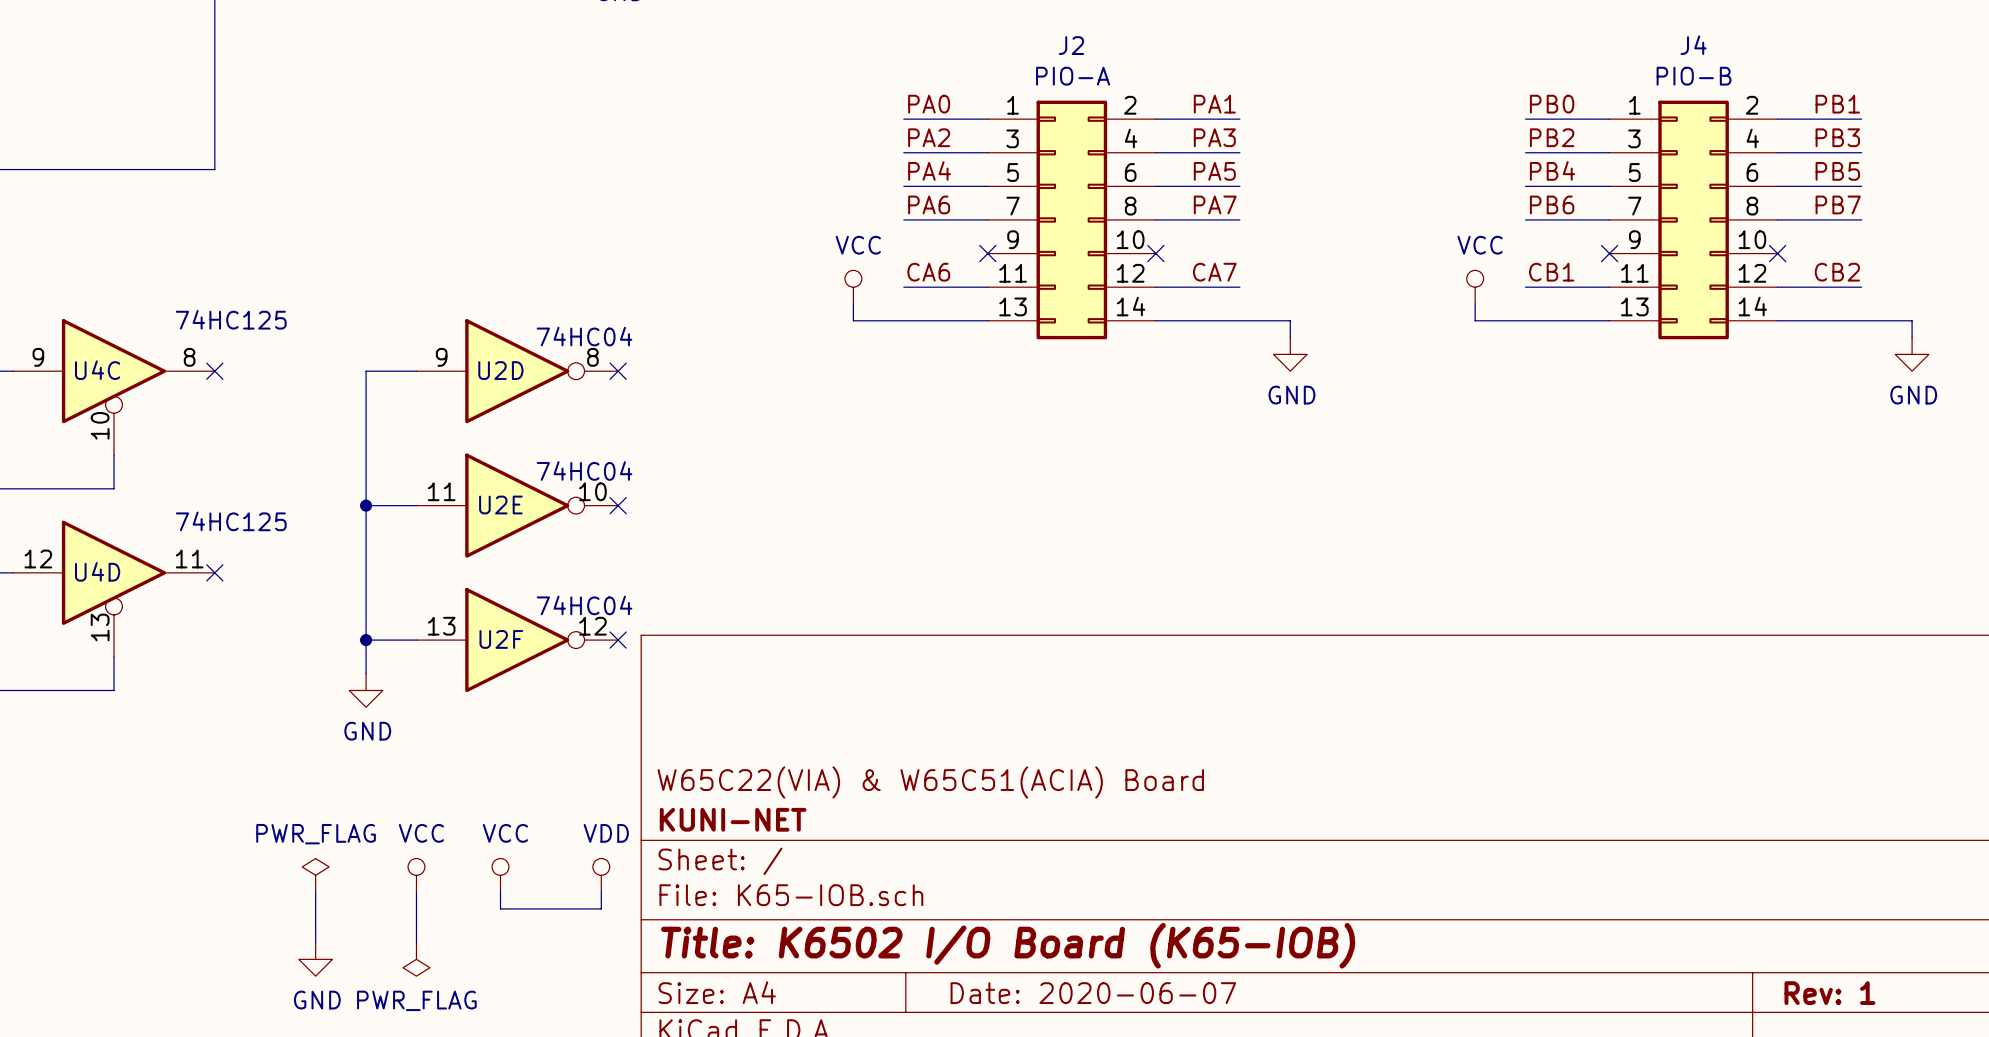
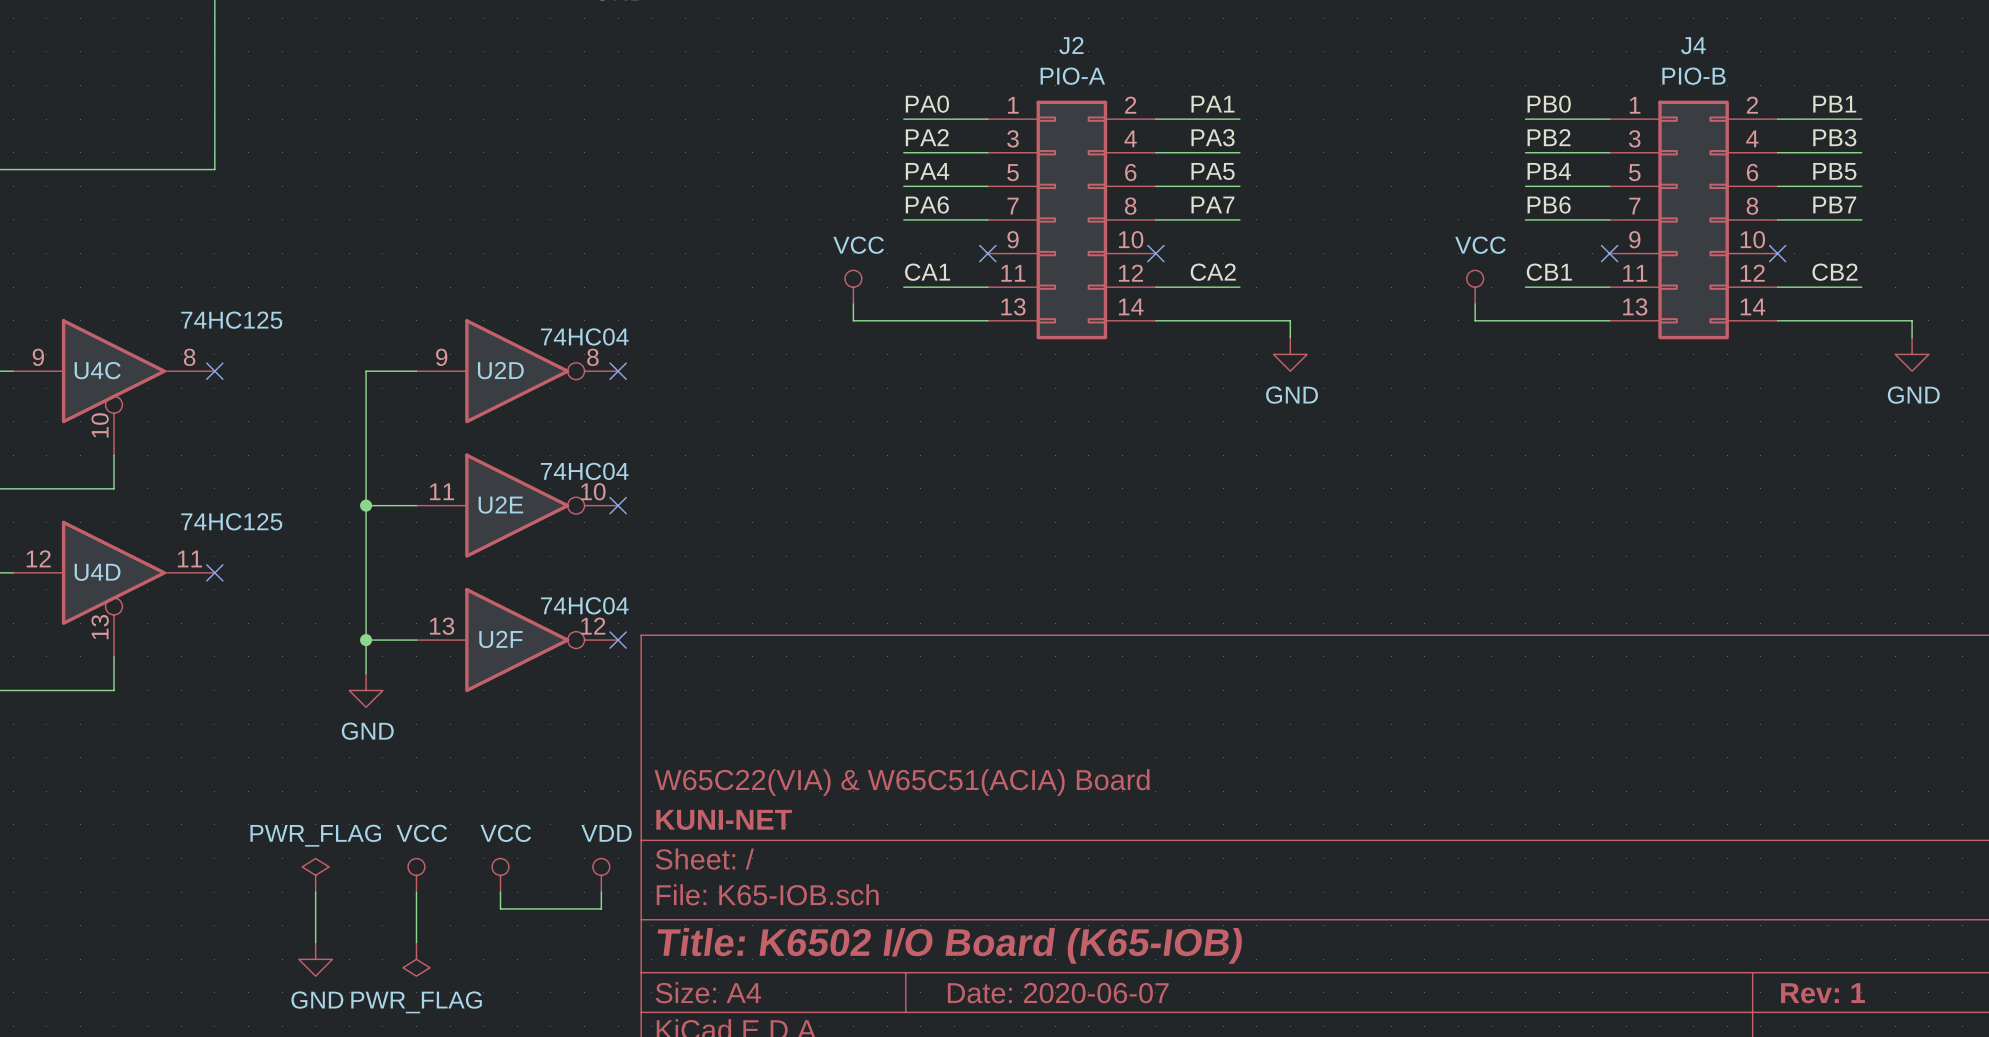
label: CA6 (928, 272) -> CA1 (927, 272)
label: CA7 (1214, 272) -> CA2 (1213, 272)

